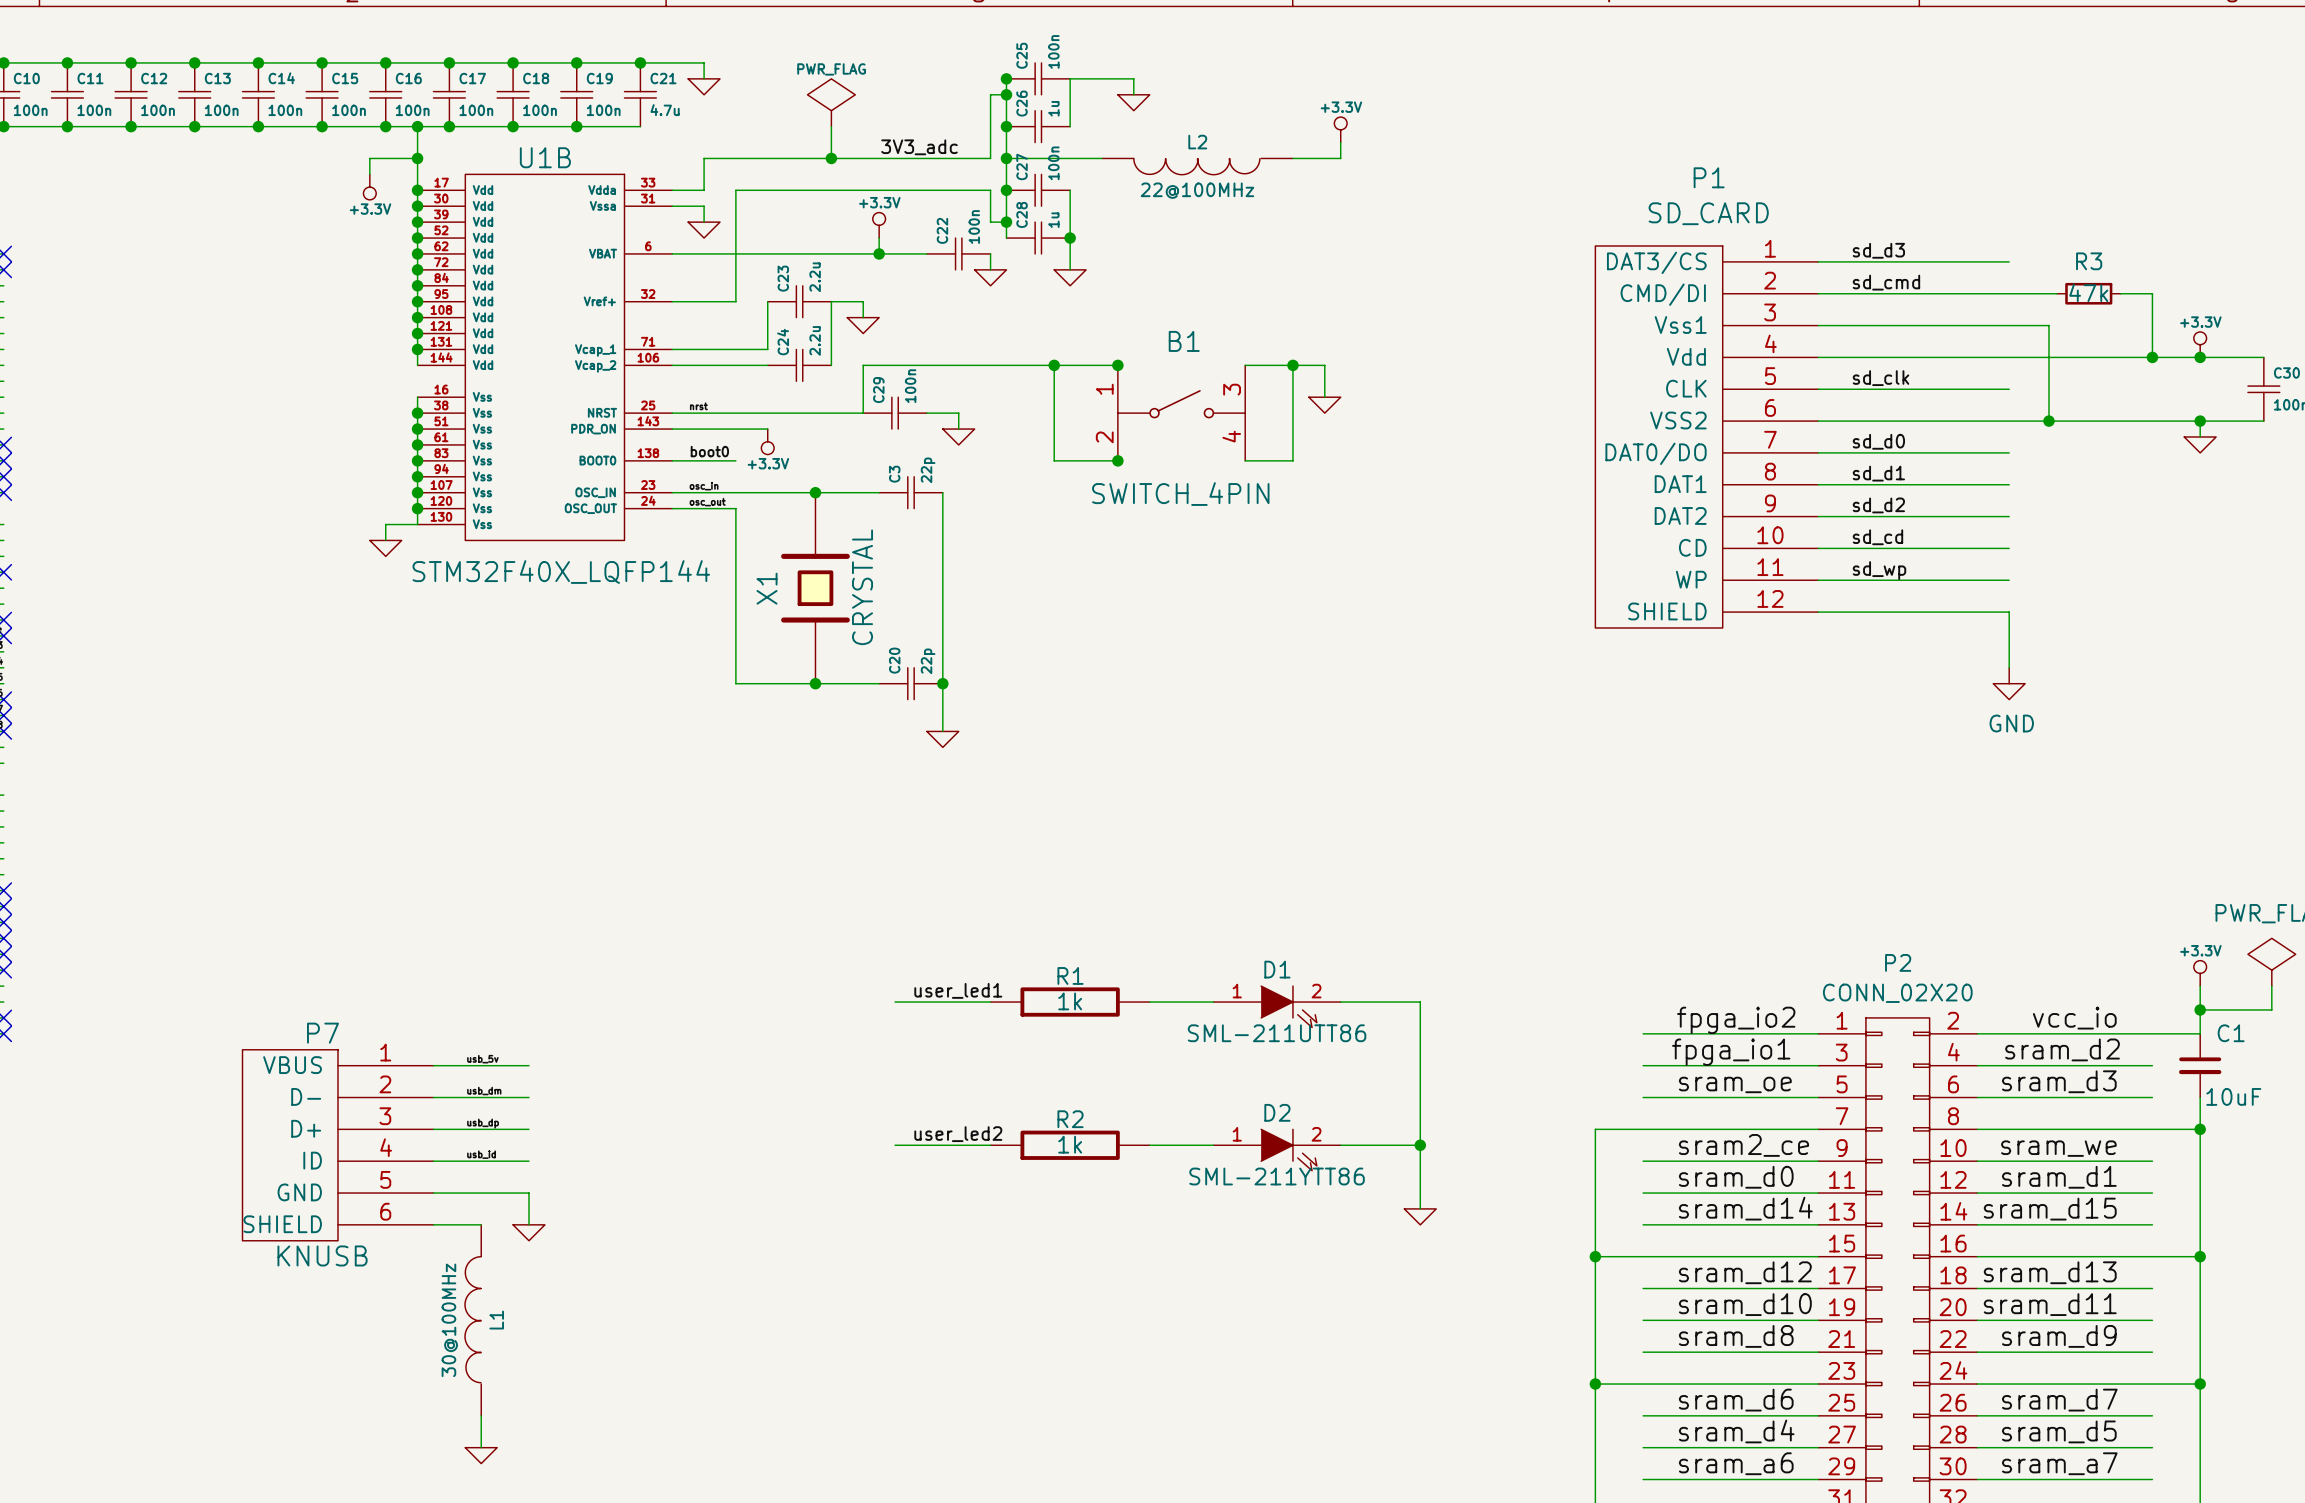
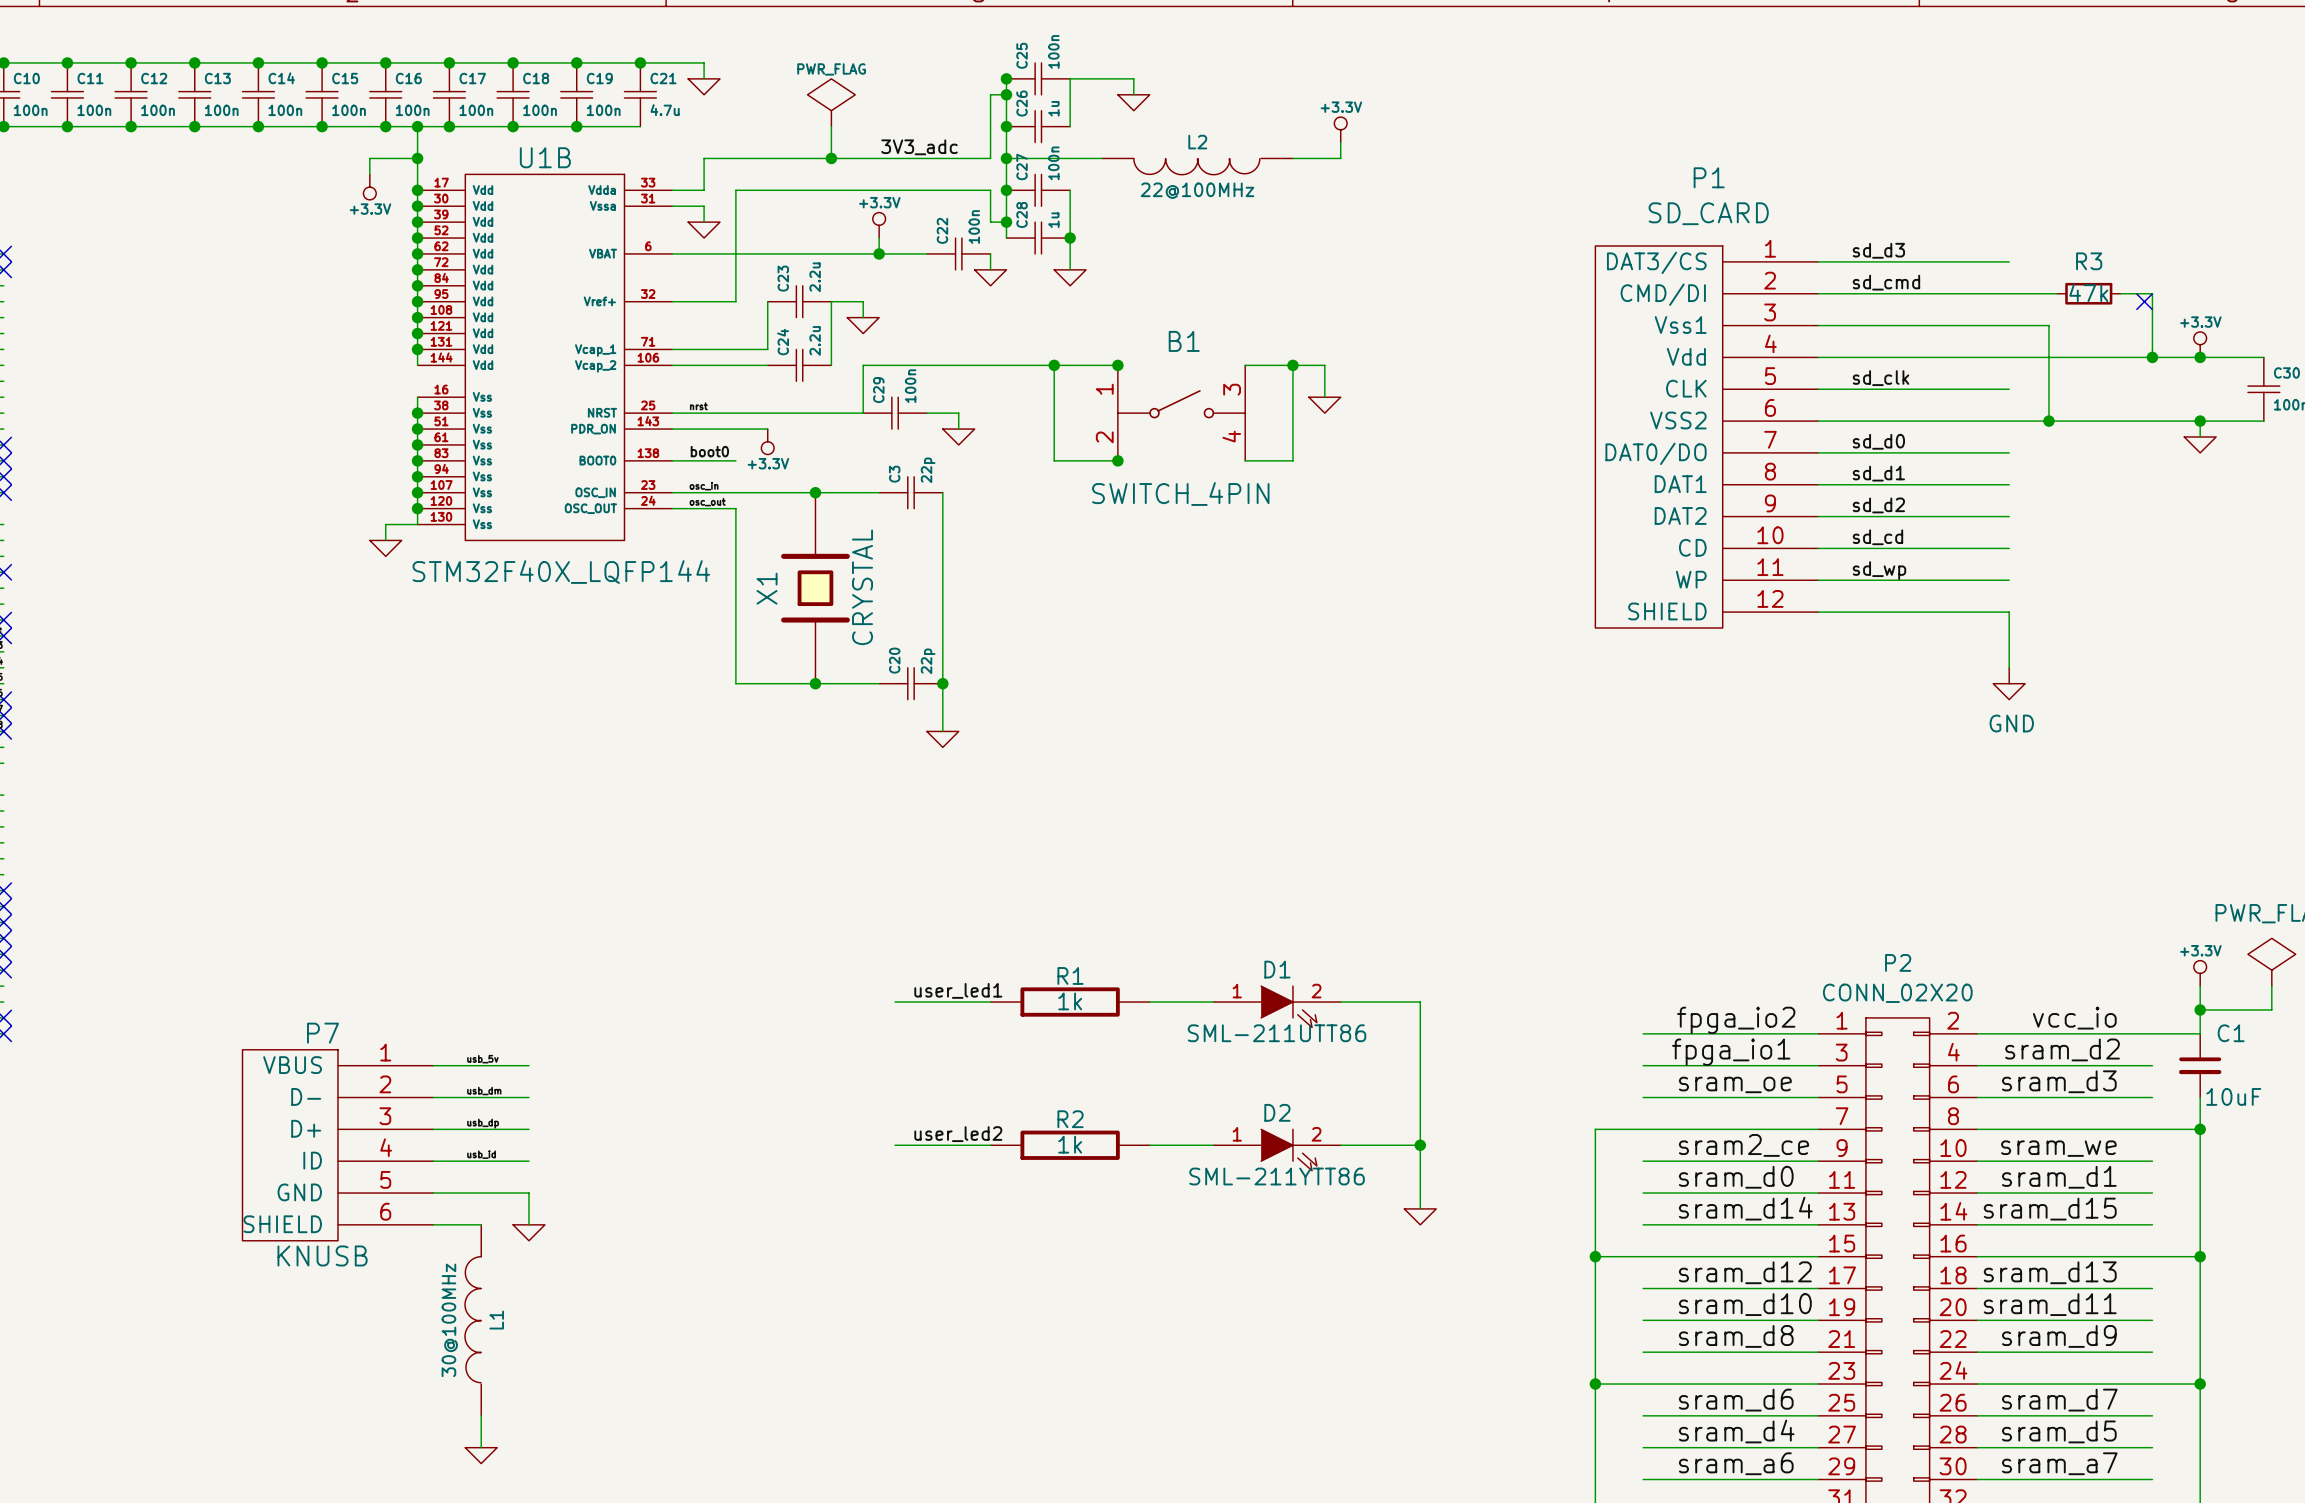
no-connect mark: none -> (2144, 301)

